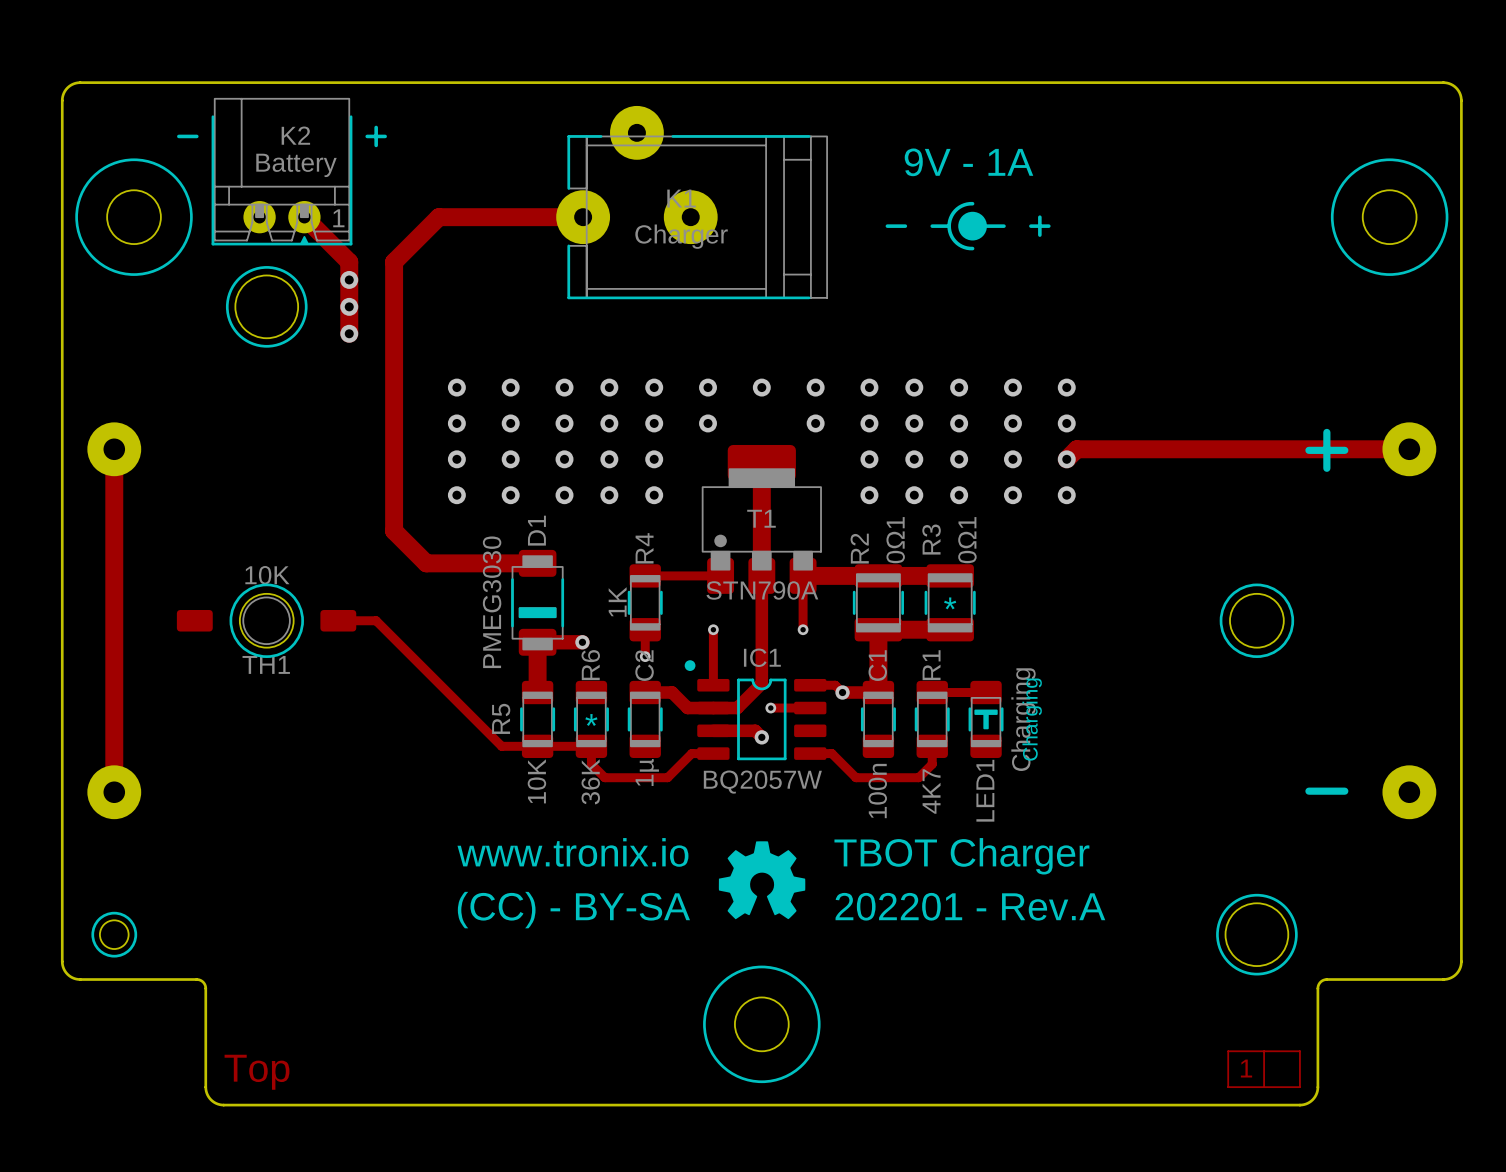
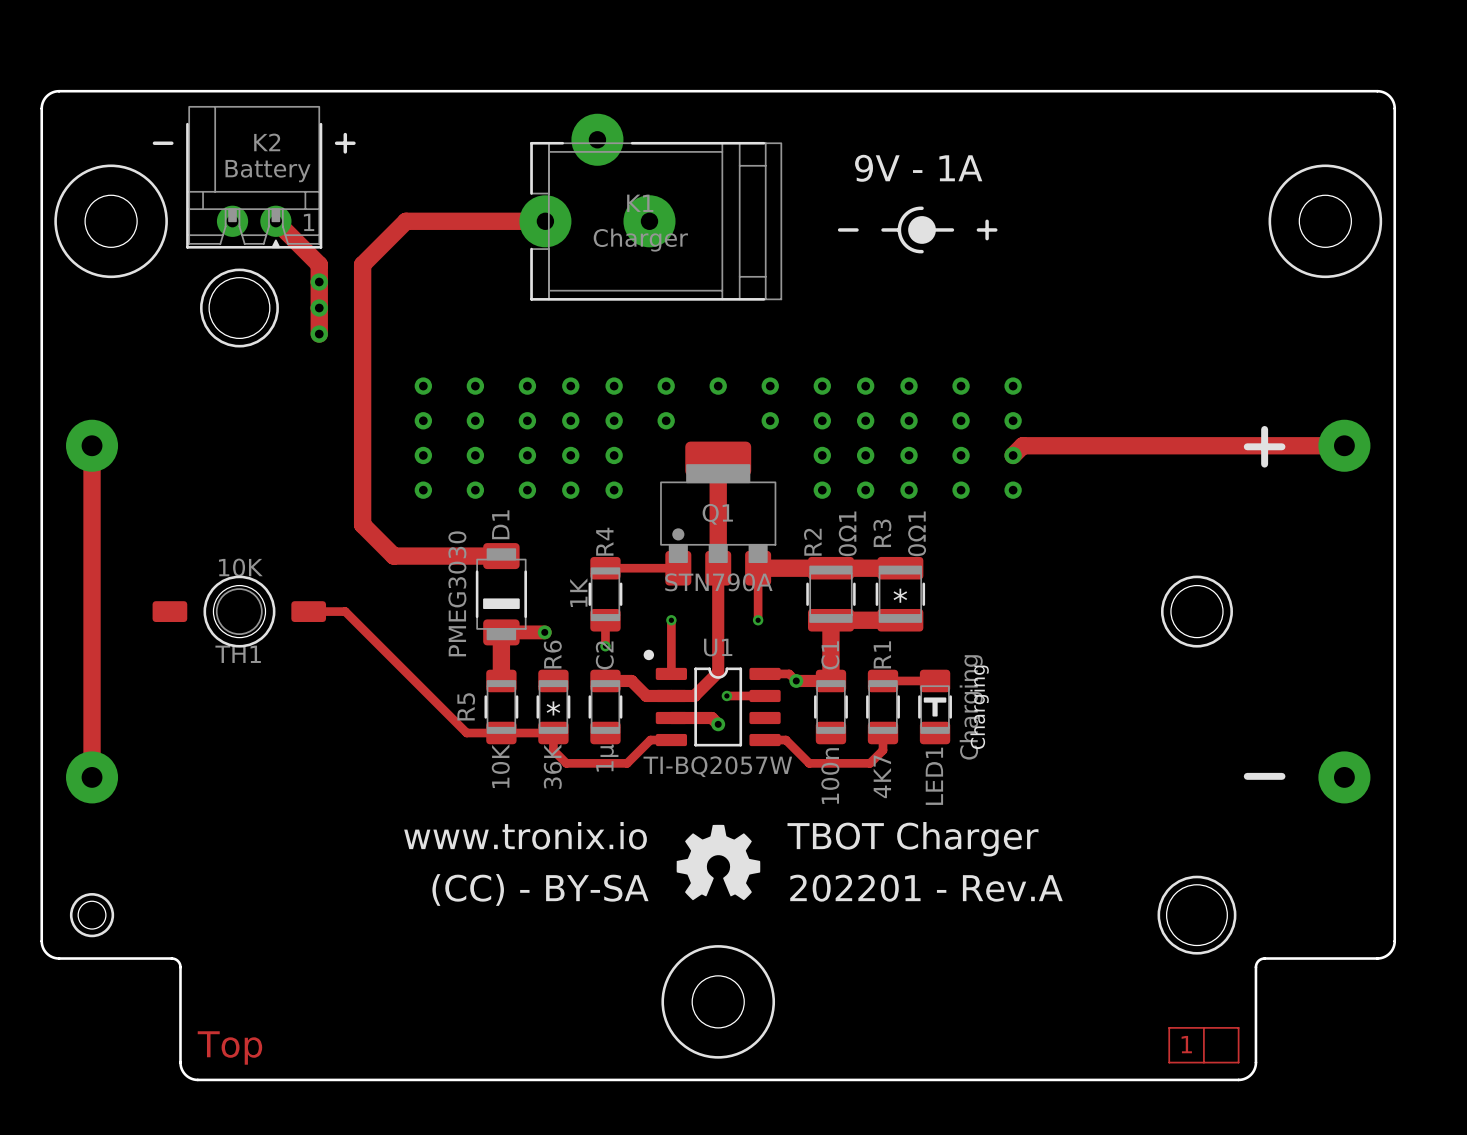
T1 name: T1 (761, 518) -> Q1 (717, 514)
IC1 name: IC1 (762, 657) -> U1 (718, 647)
IC1 value: BQ2057W (762, 782) -> TI-BQ2057W (717, 766)

